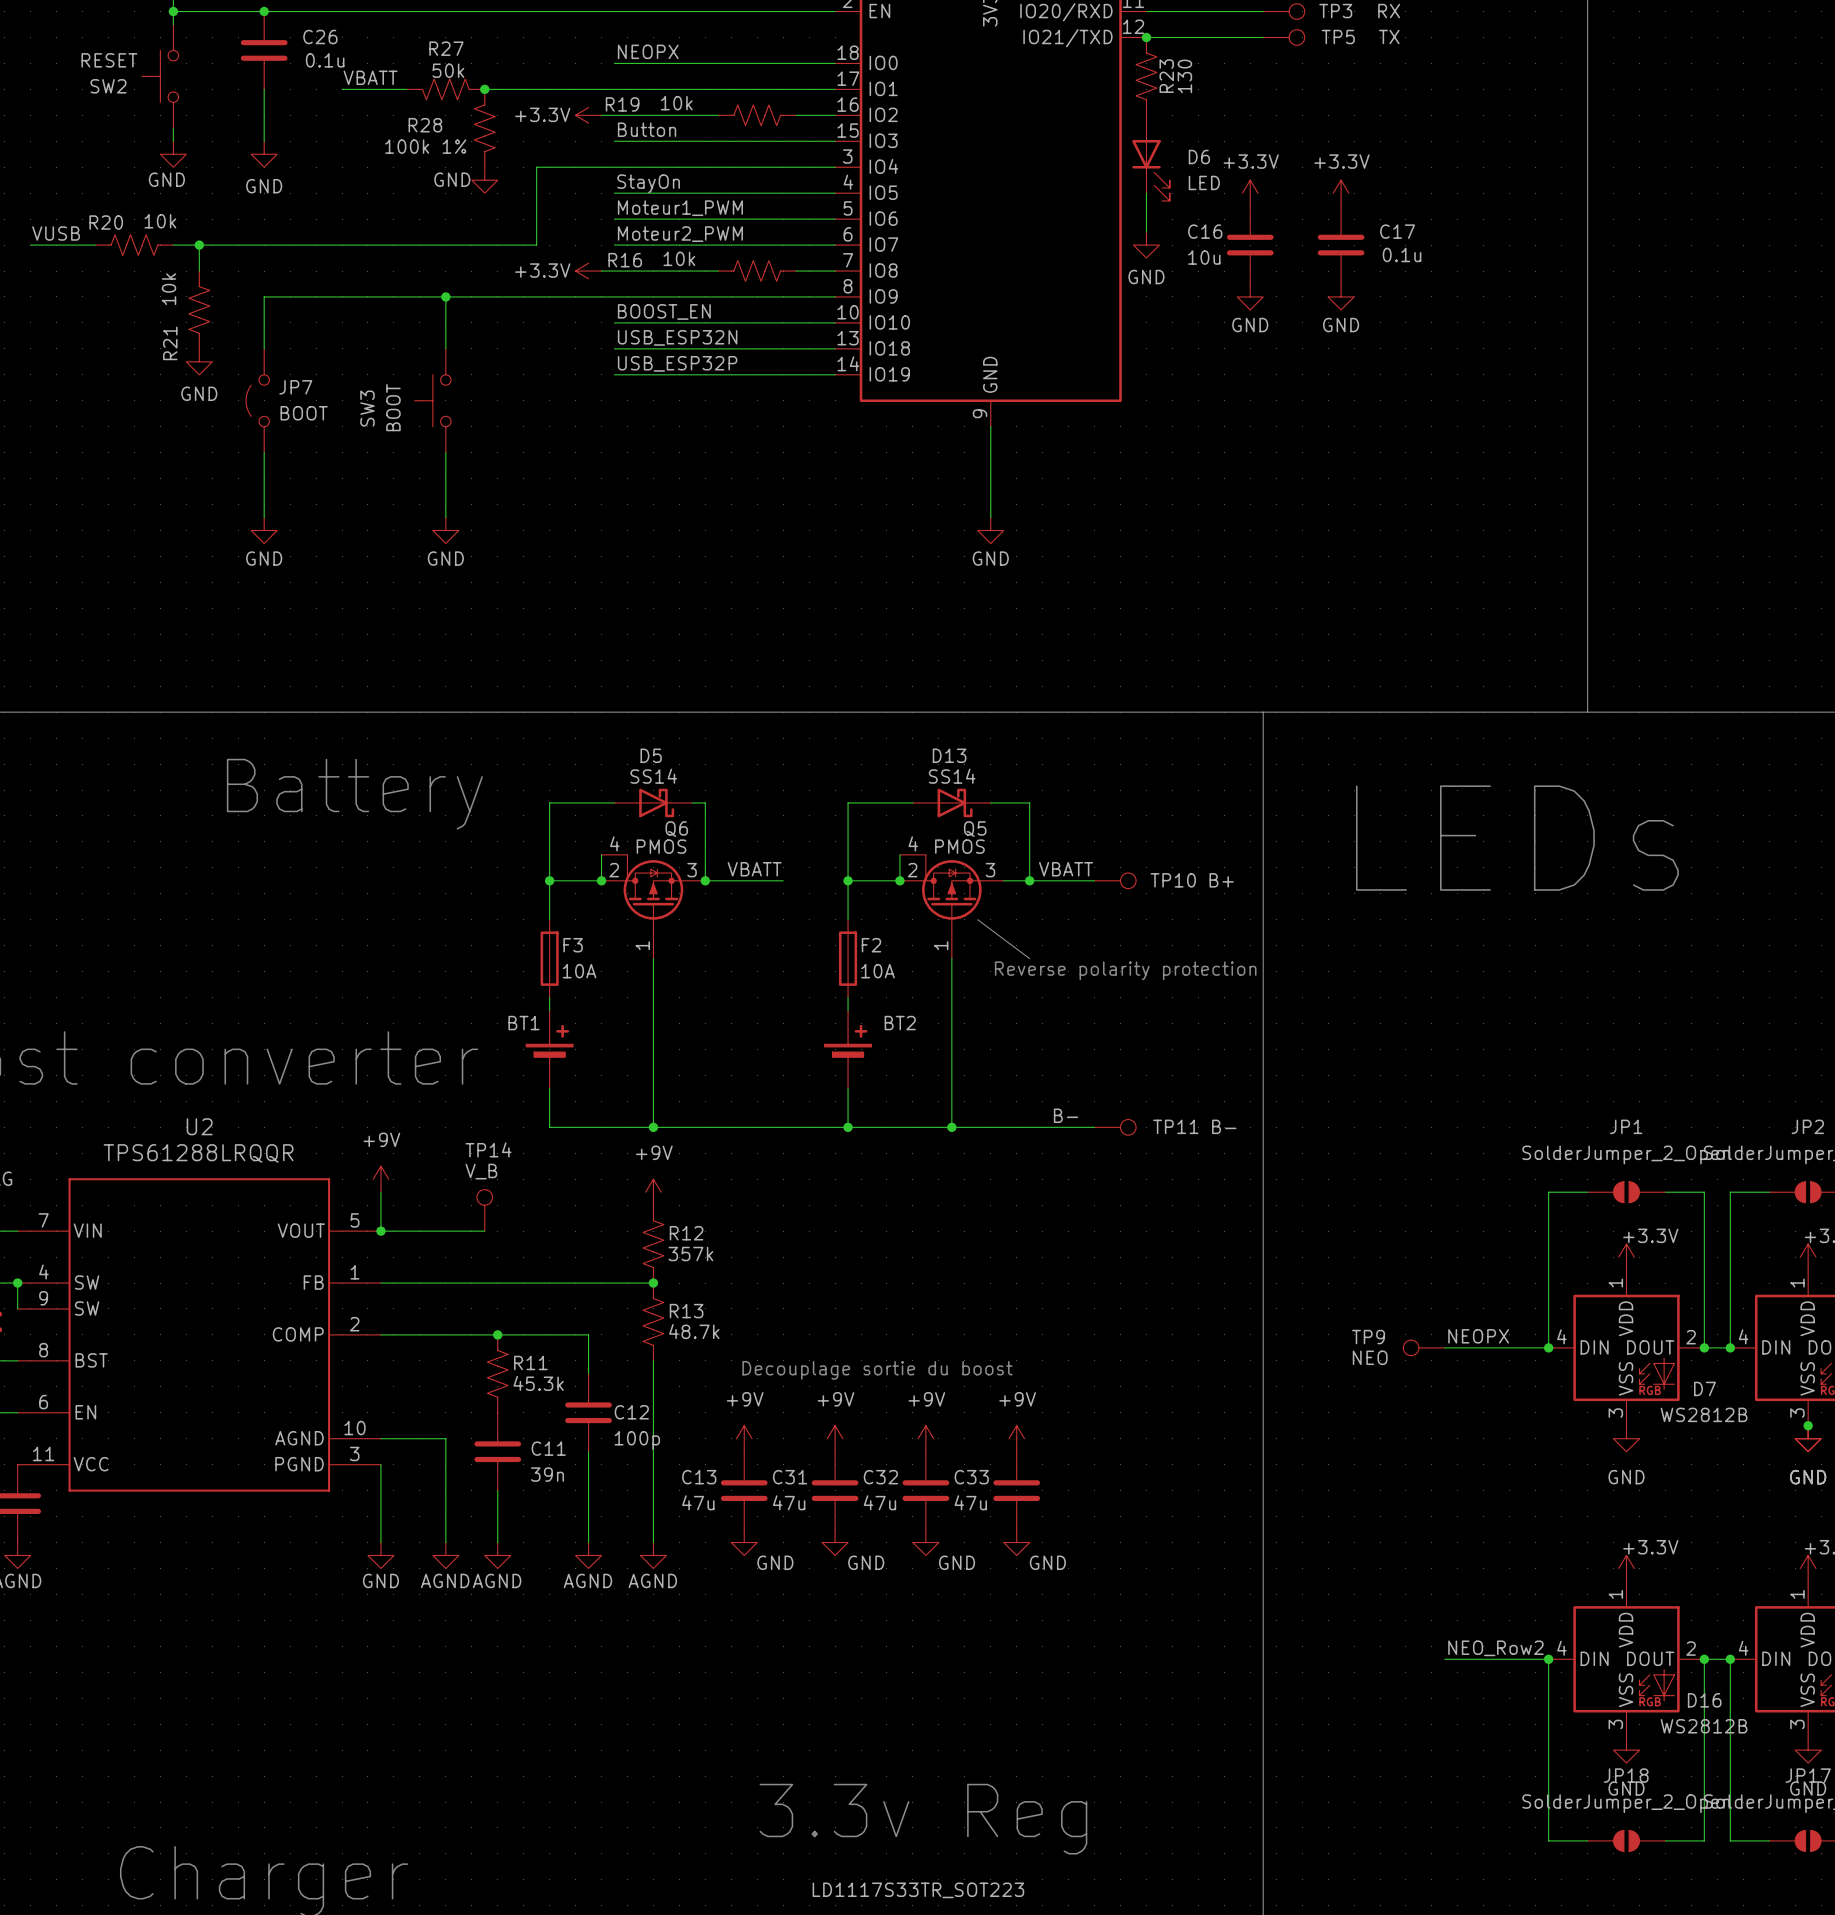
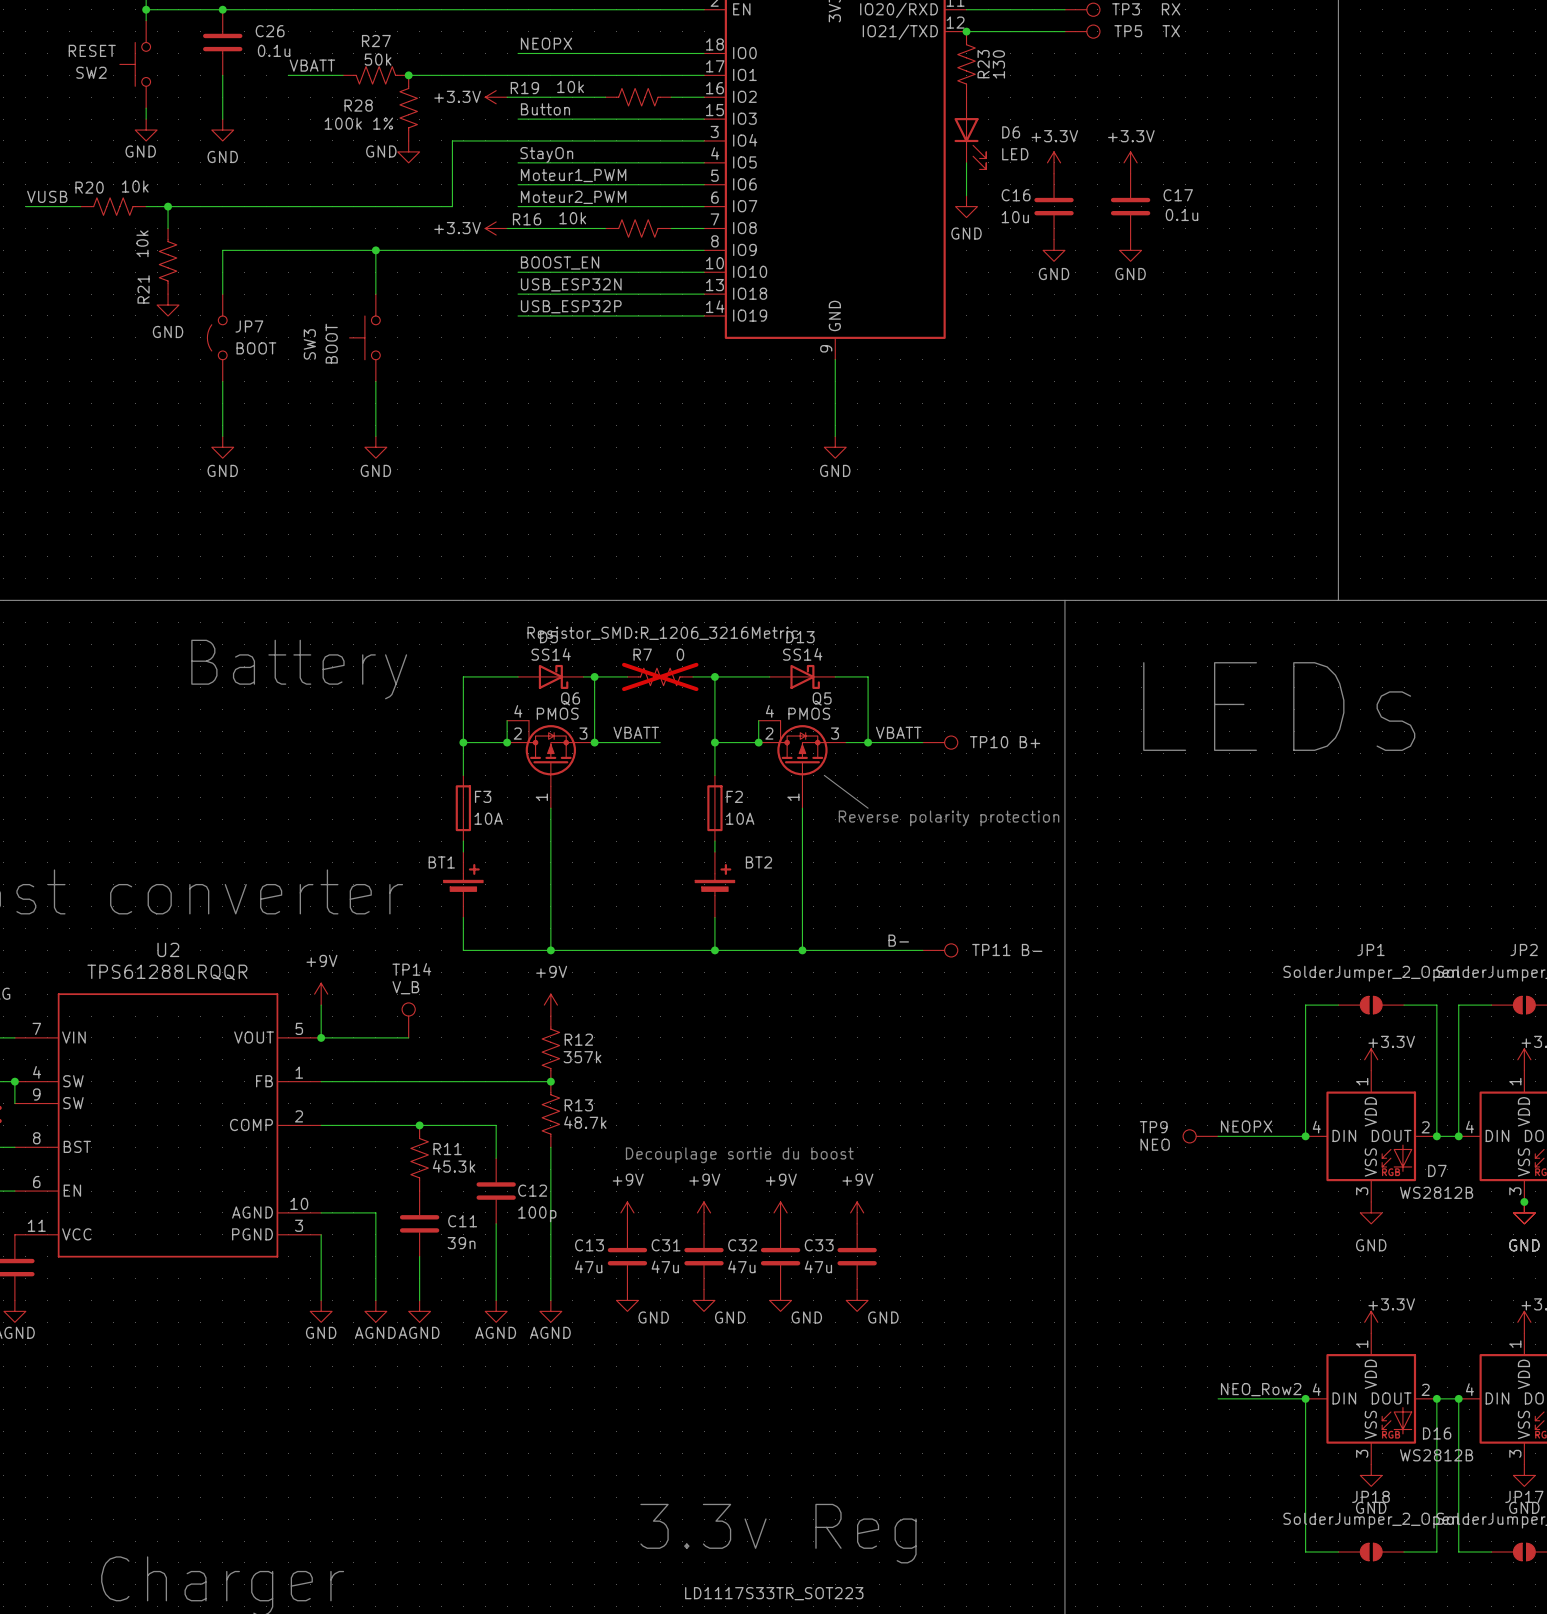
wire: none -> (594, 676) (627, 676)
junction: none -> (594, 676)
R7: none -> 0 (660, 676)
wire: none -> (693, 676) (714, 676)
junction: none -> (714, 676)

